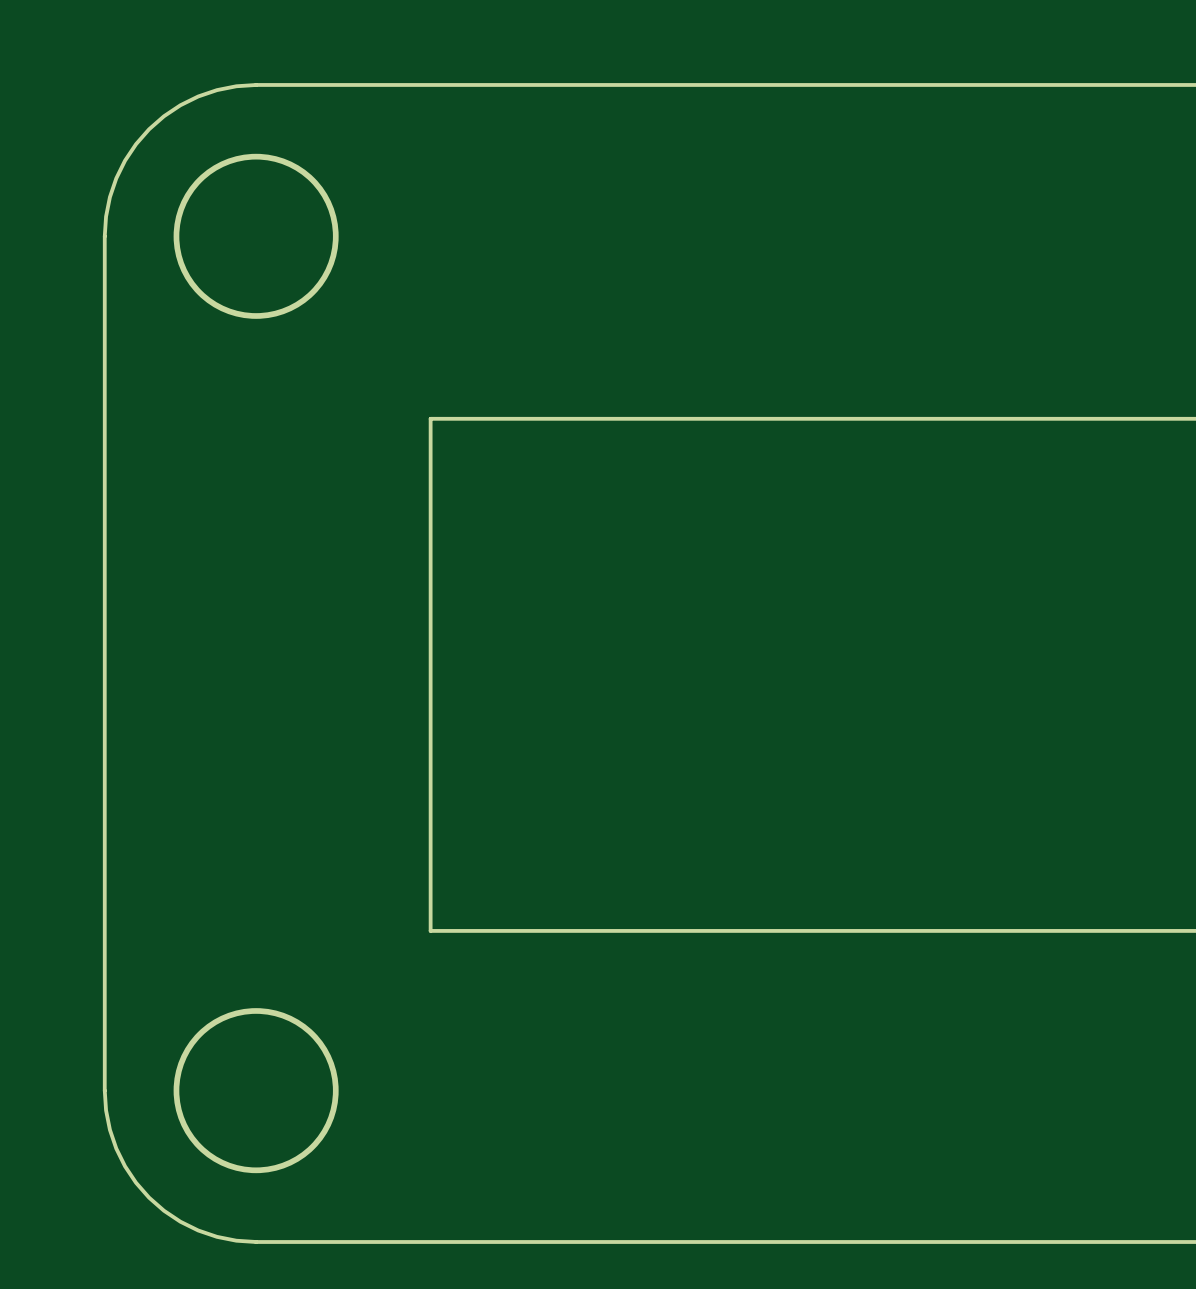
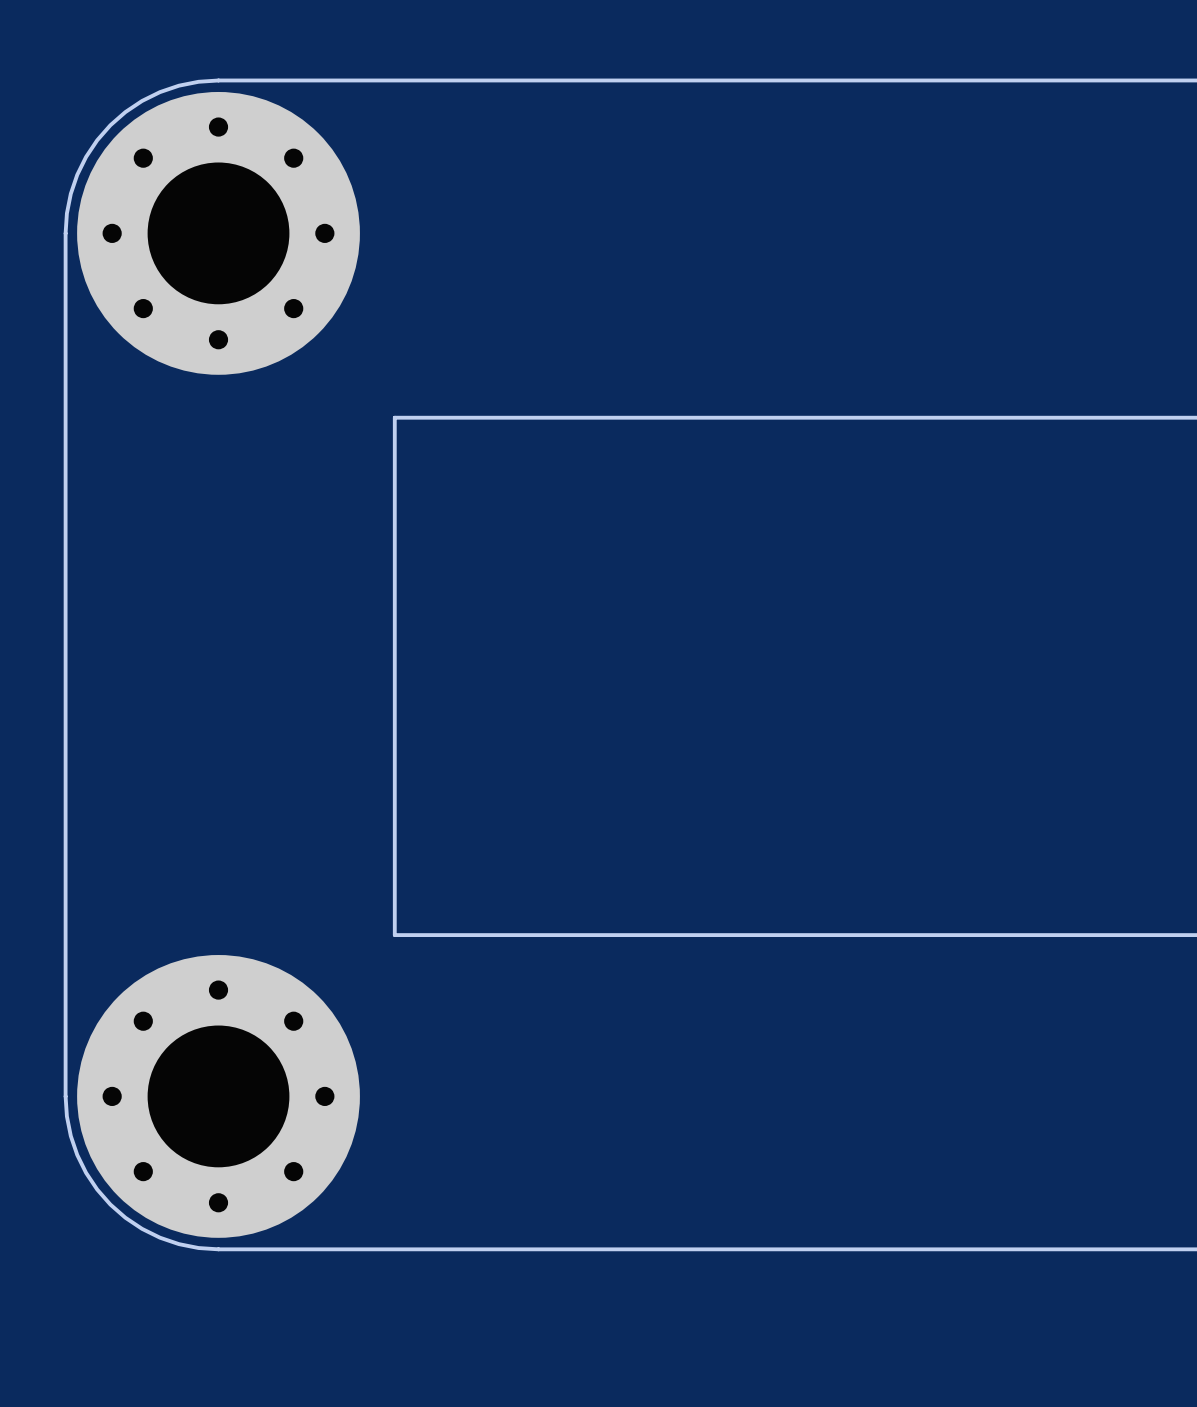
round board edge: [173, 153, 339, 319] -> none
part: none -> (218, 233)
round board edge: [173, 1008, 339, 1174] -> none
part: none -> (218, 1096)

